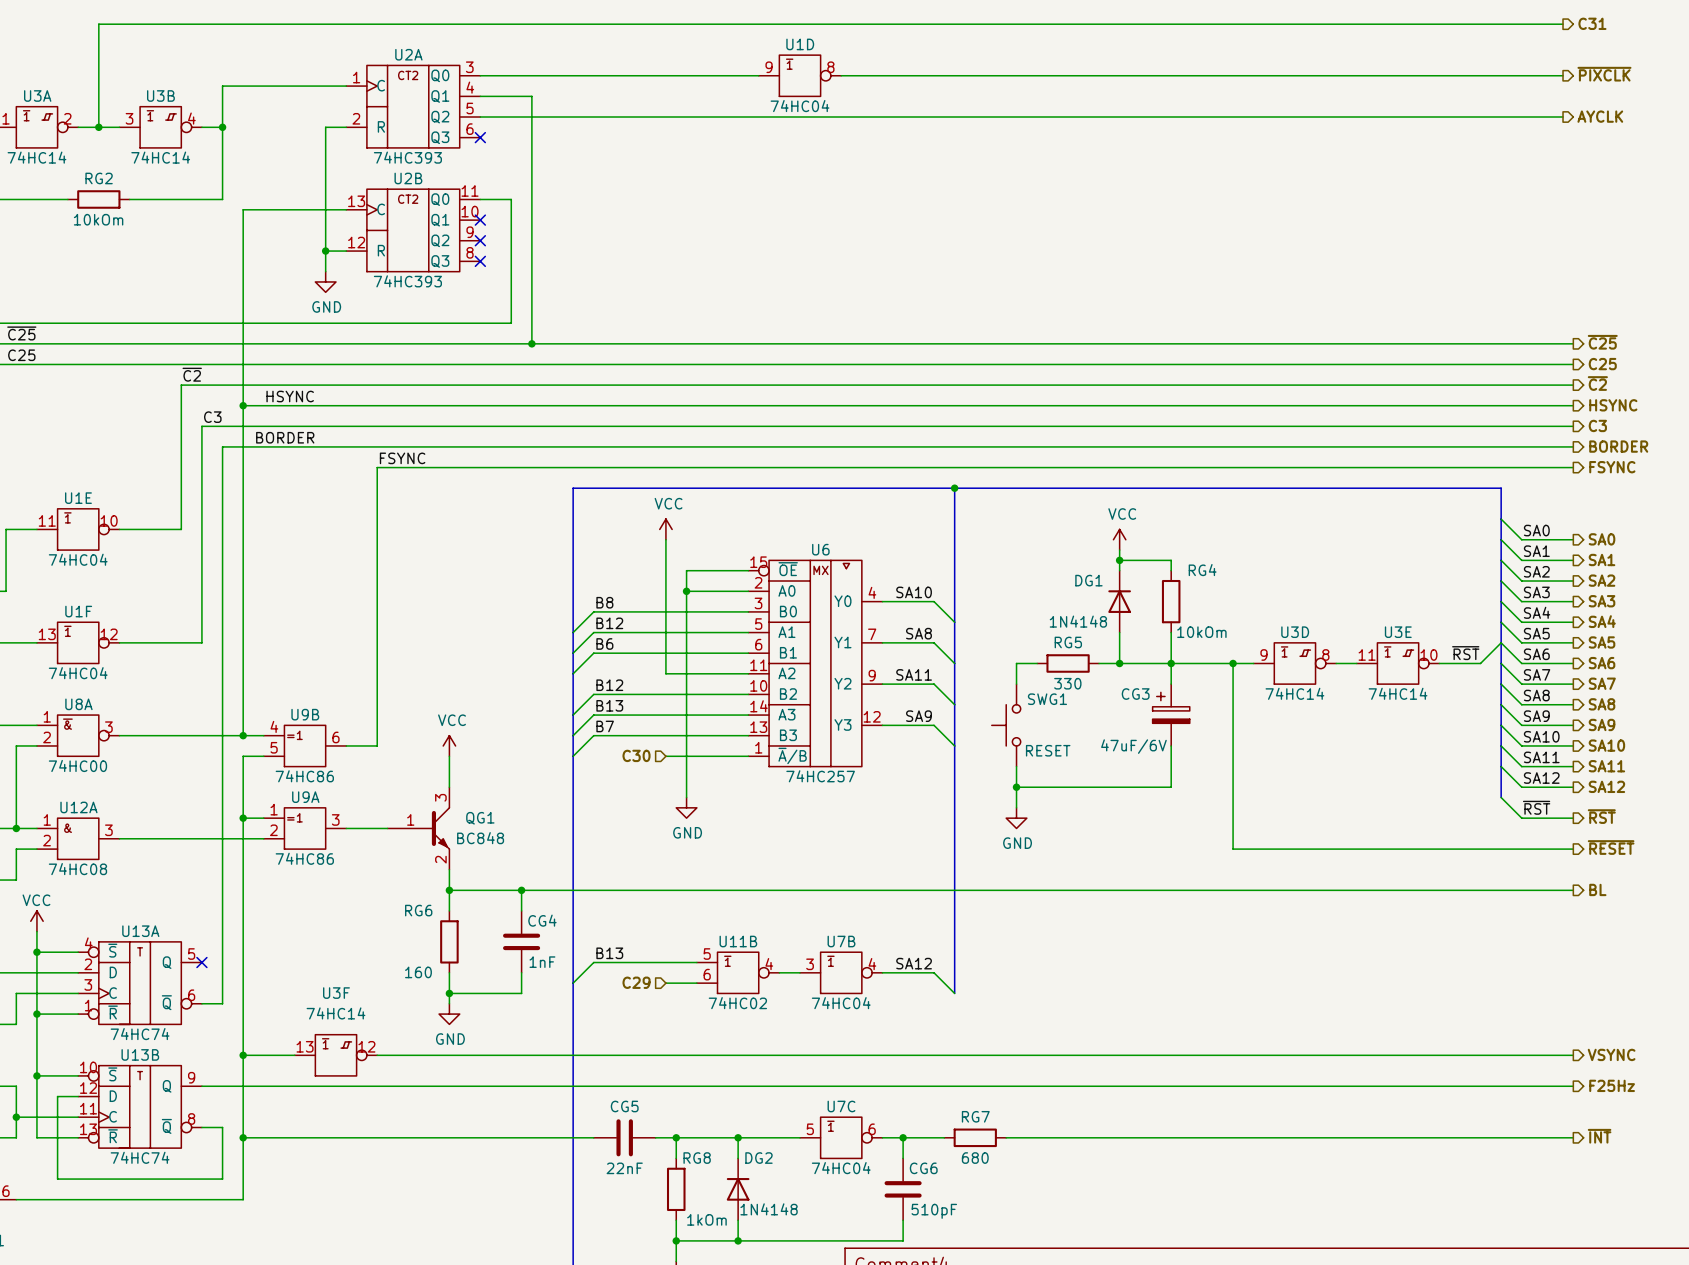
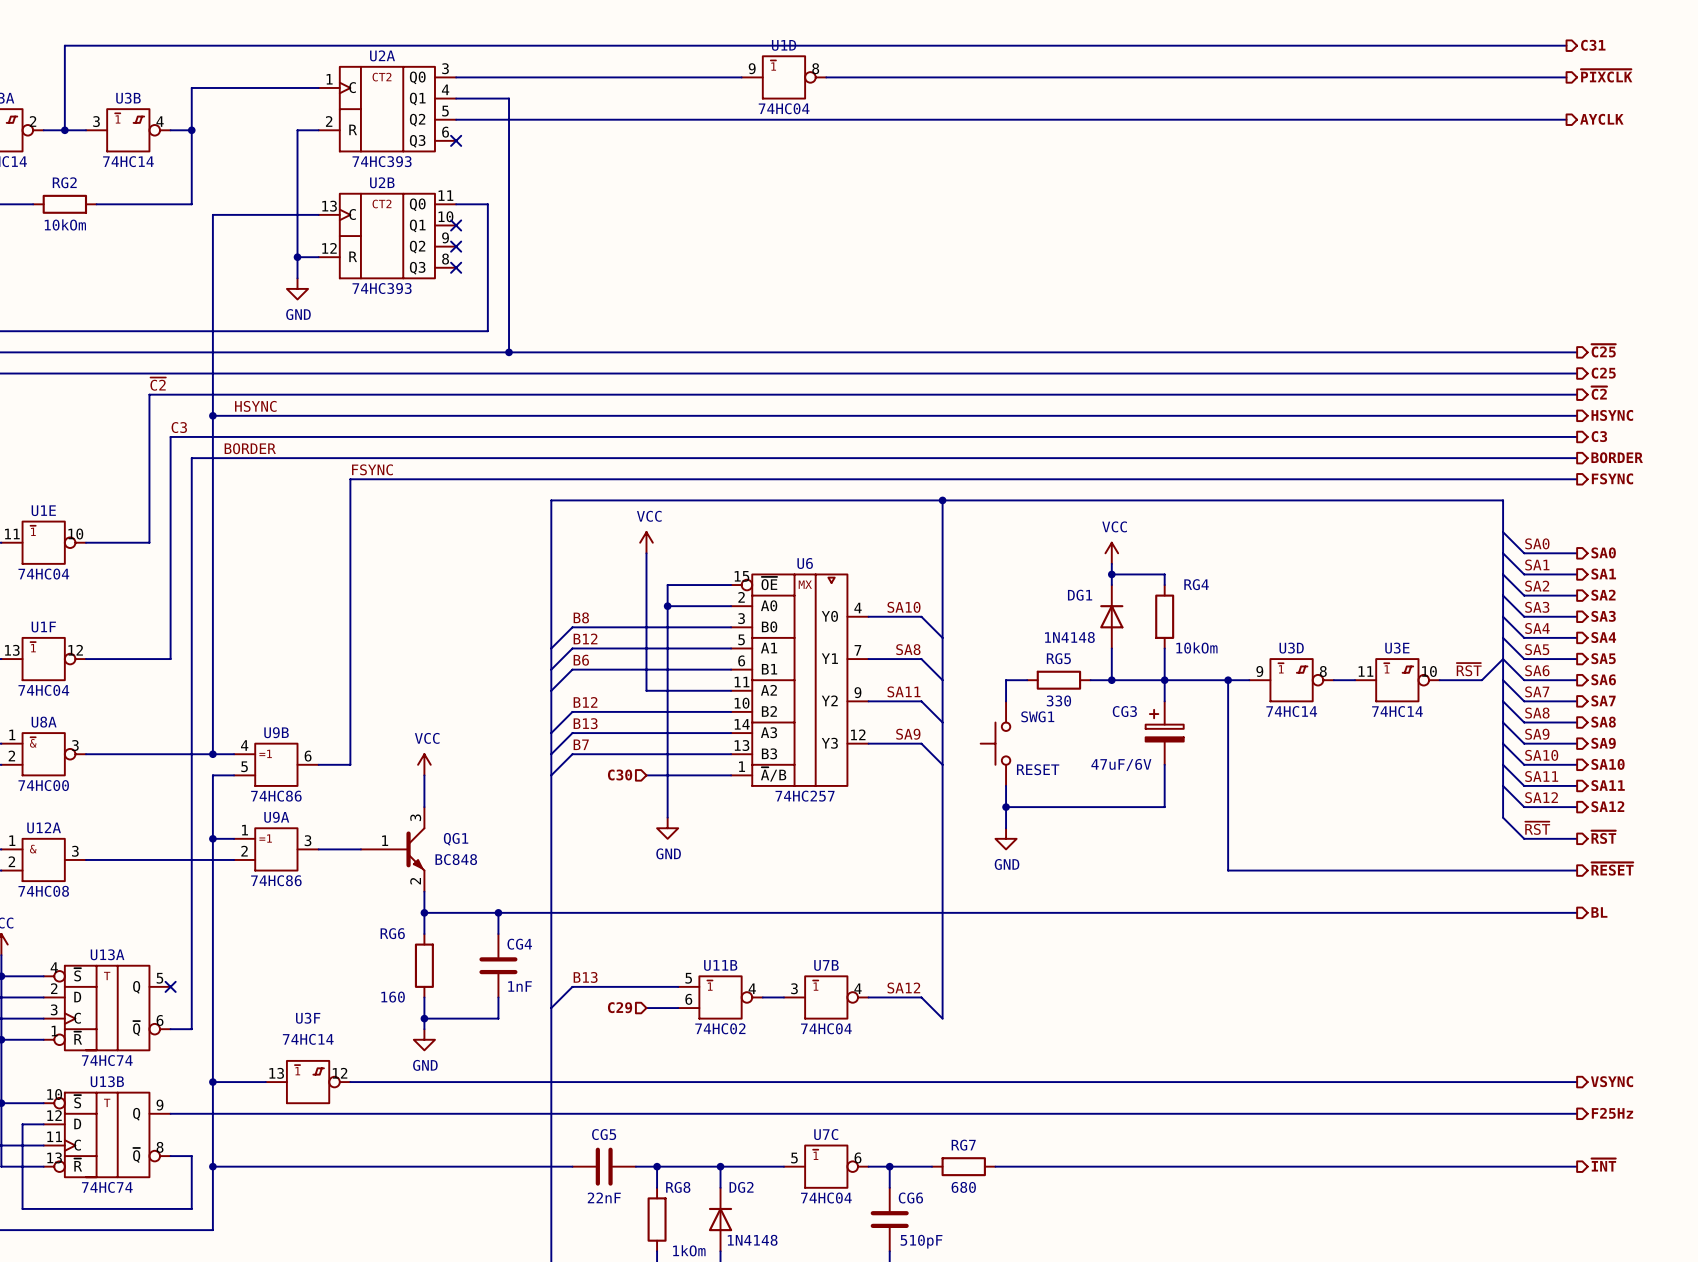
hierarchical label position: C31 (1592, 23) -> C31 (1593, 45)
wire: (1563, 24) (98, 24) (98, 44) -> (1566, 45) (64, 45)

